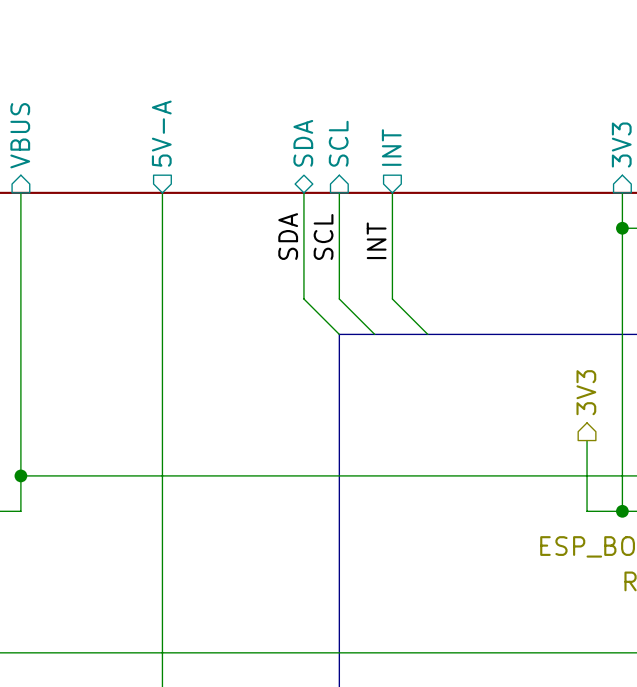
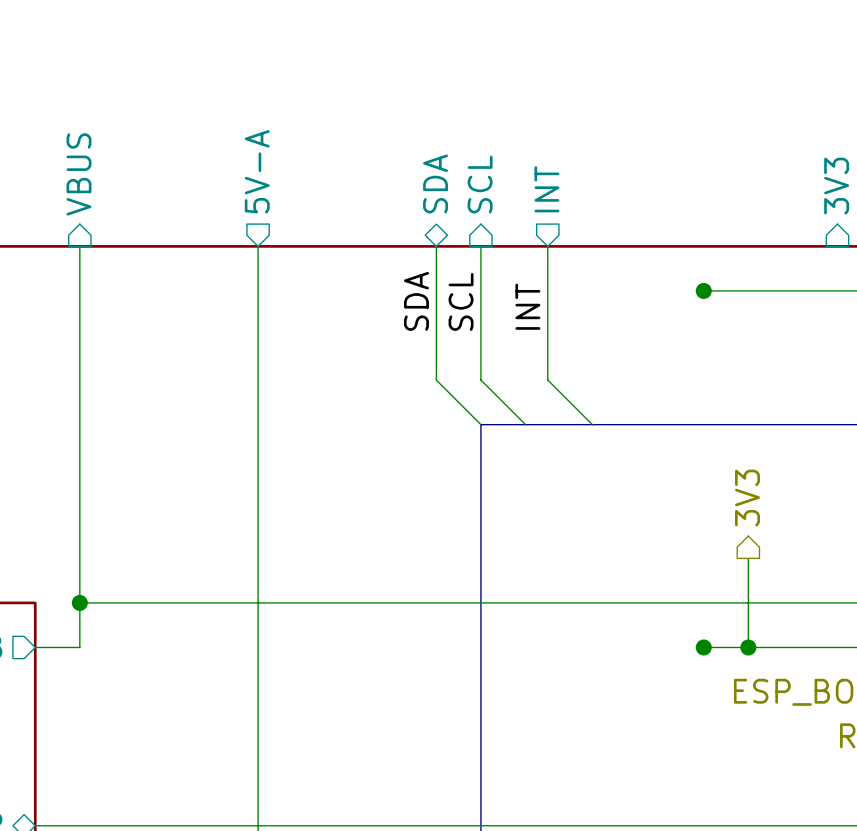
wire: (622, 192) (622, 511) -> none
wire: none -> (703, 290) (837, 290)
junction: none -> (703, 290)
junction: (622, 228) -> none
hierarchical label position: 3V3 (586, 392) -> 3V3 (747, 498)
wire: none -> (748, 558) (748, 647)
wire: (587, 440) (587, 511) -> (703, 647) (792, 647)
junction: none -> (703, 647)
junction: none -> (748, 647)
junction: (622, 511) -> none

